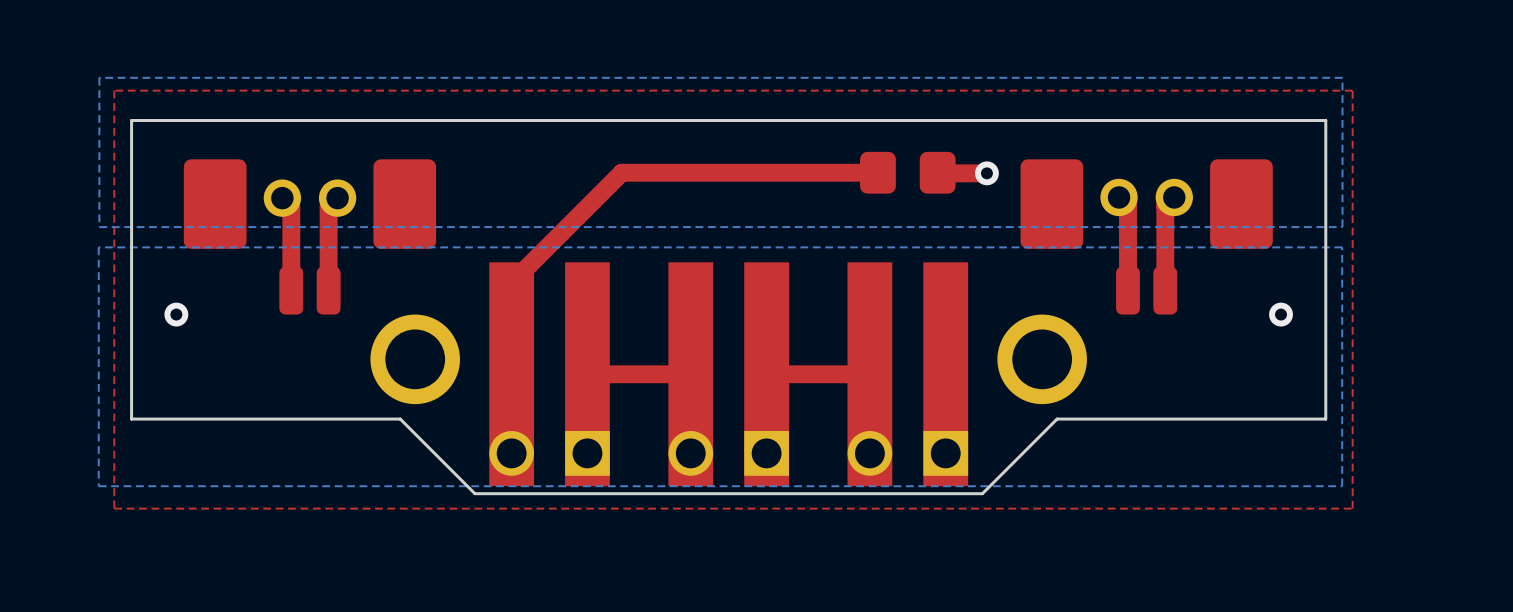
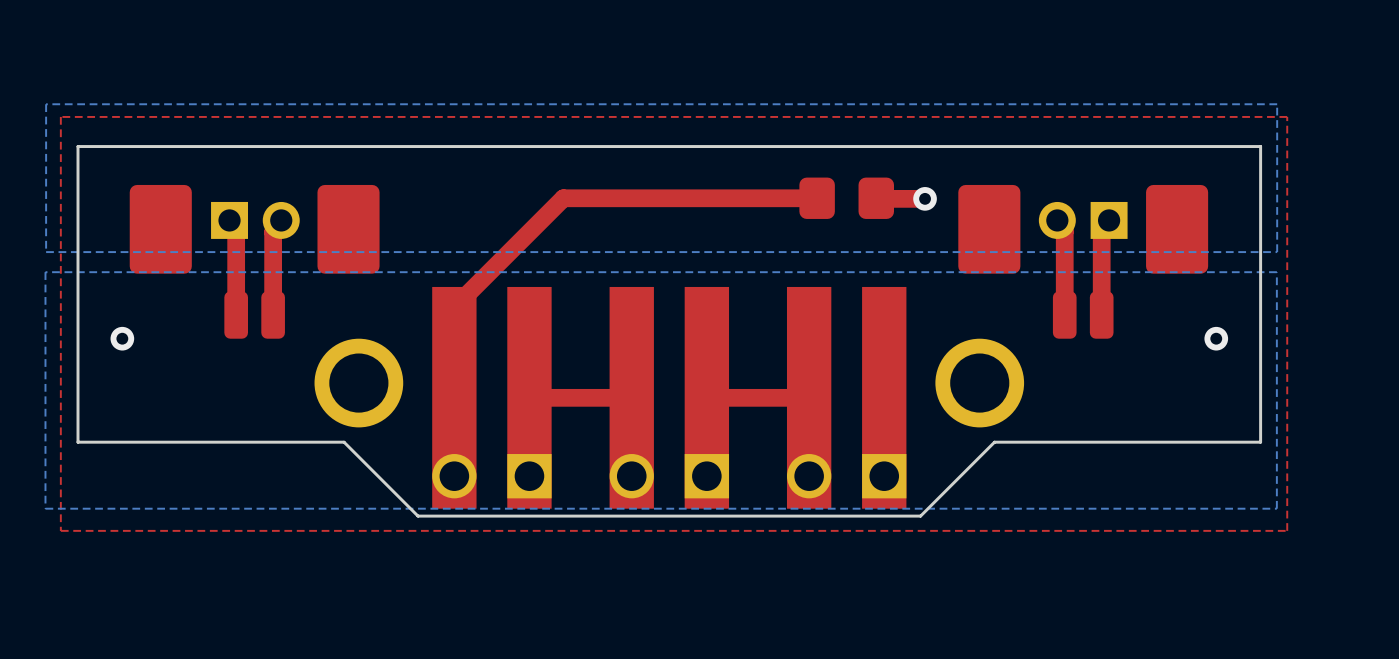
part: none -> (255, 220)
part: none -> (1083, 220)
part: (1119, 197) -> none
part: (1174, 197) -> none
part: (282, 198) -> none
part: (337, 198) -> none

